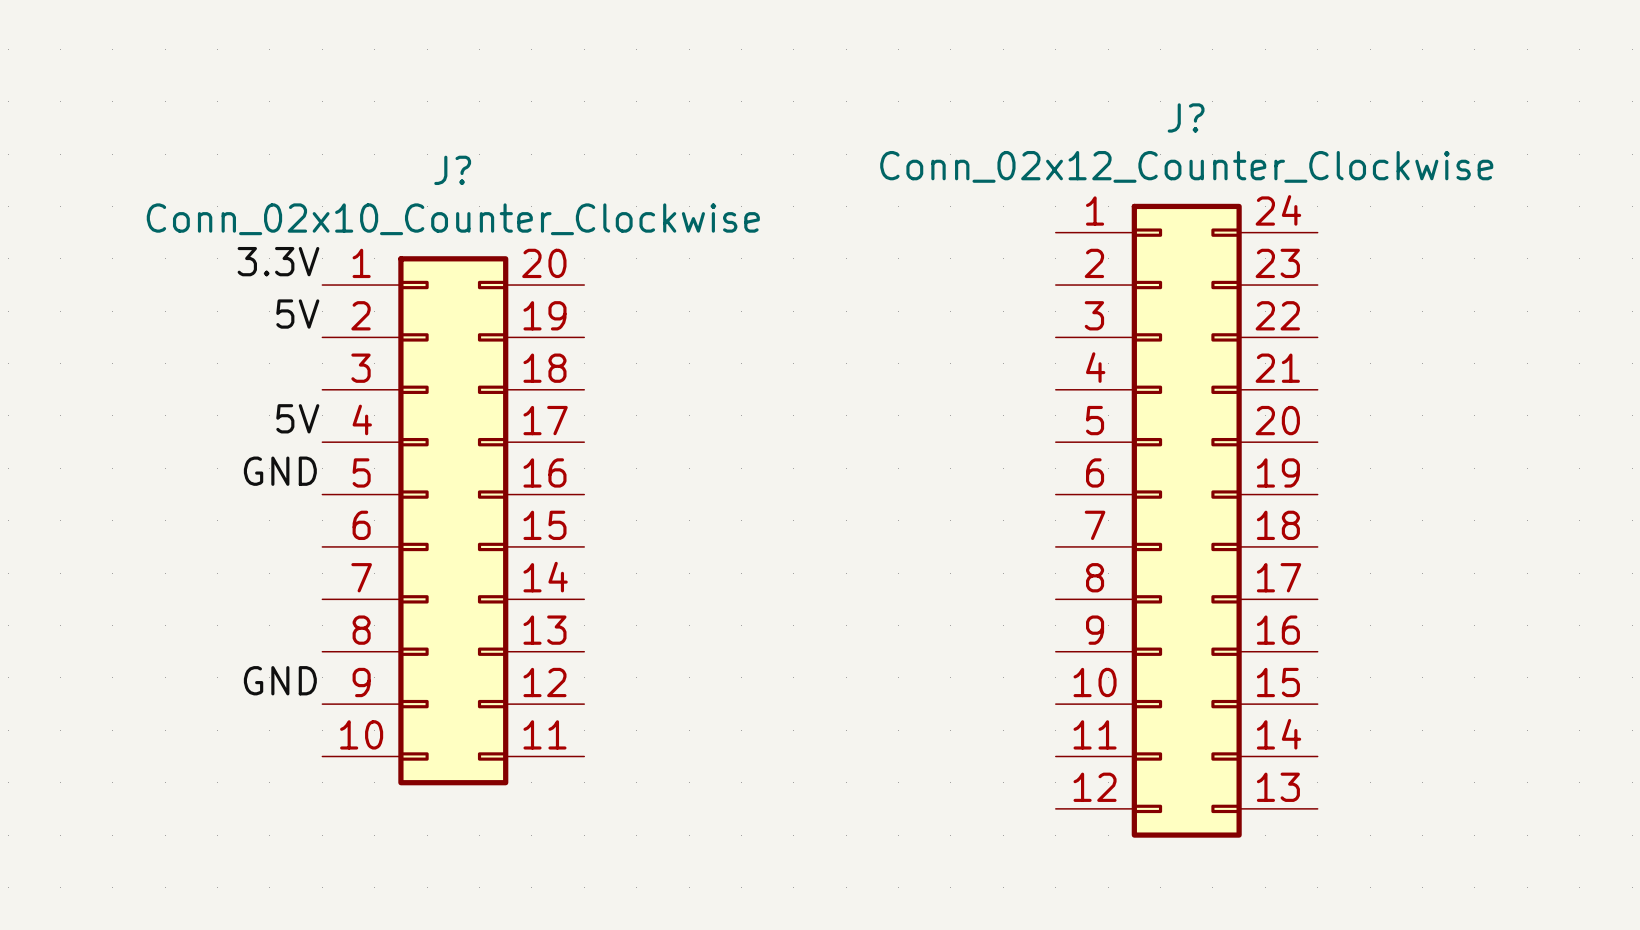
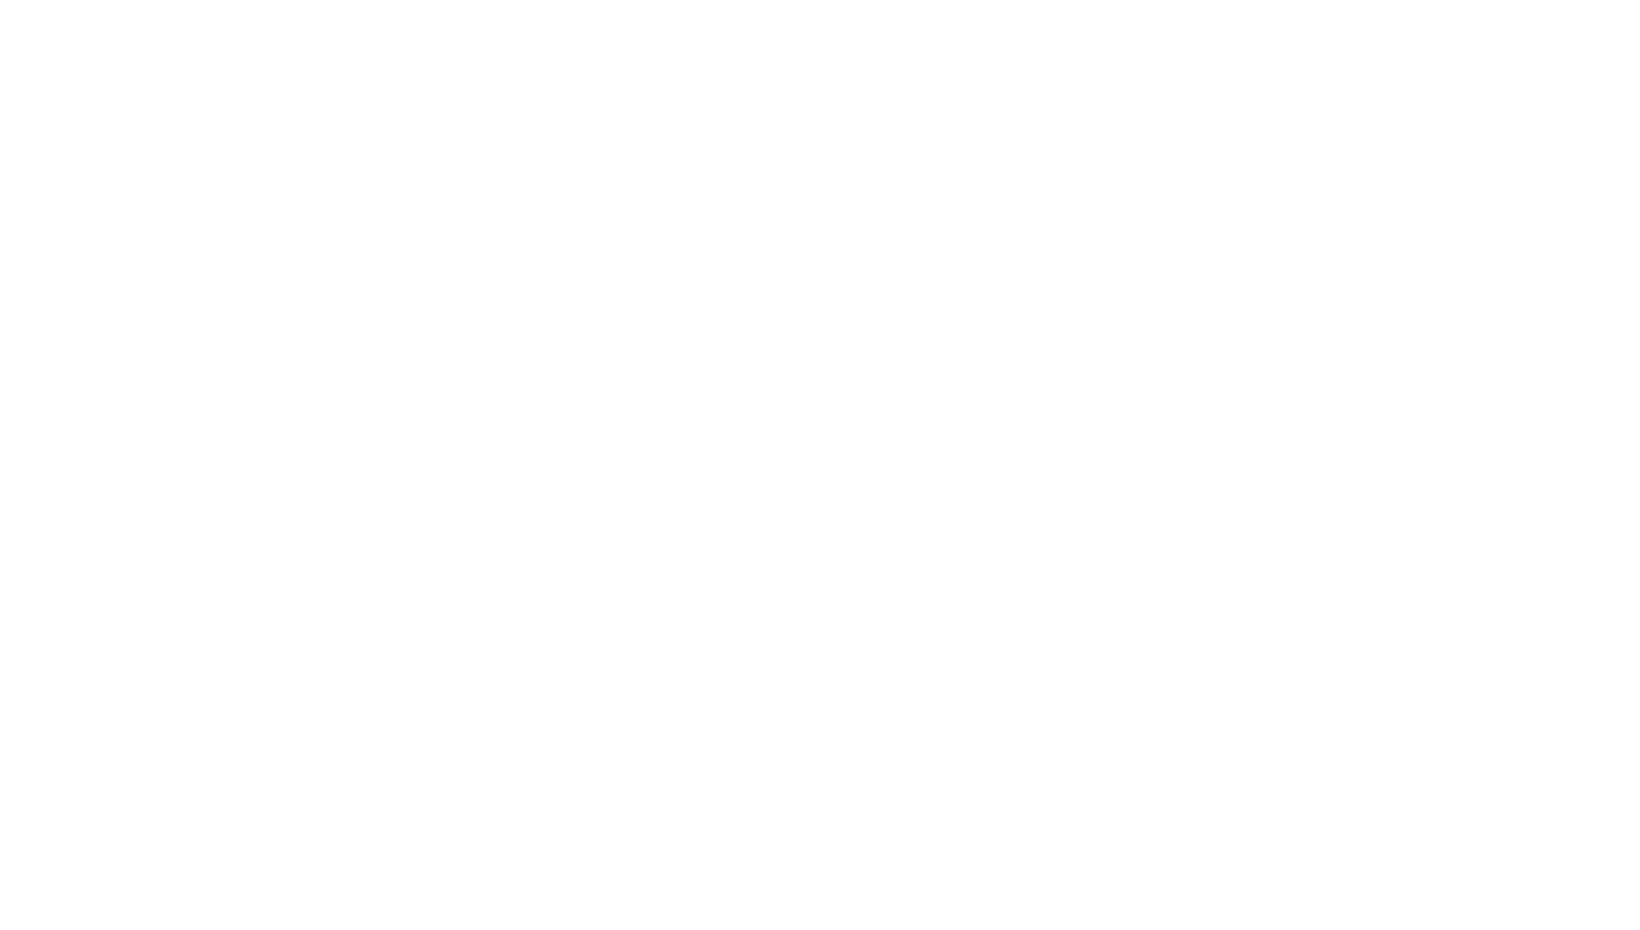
label: 3.3V (278, 261) -> none
label: 5V (297, 314) -> none
label: 5V (297, 418) -> none
label: GND (280, 471) -> none
J?: Conn_02x10_Counter_Clockwise (453, 520) -> none
J?: Conn_02x12_Counter_Clockwise (1186, 520) -> none
label: GND (280, 680) -> none

